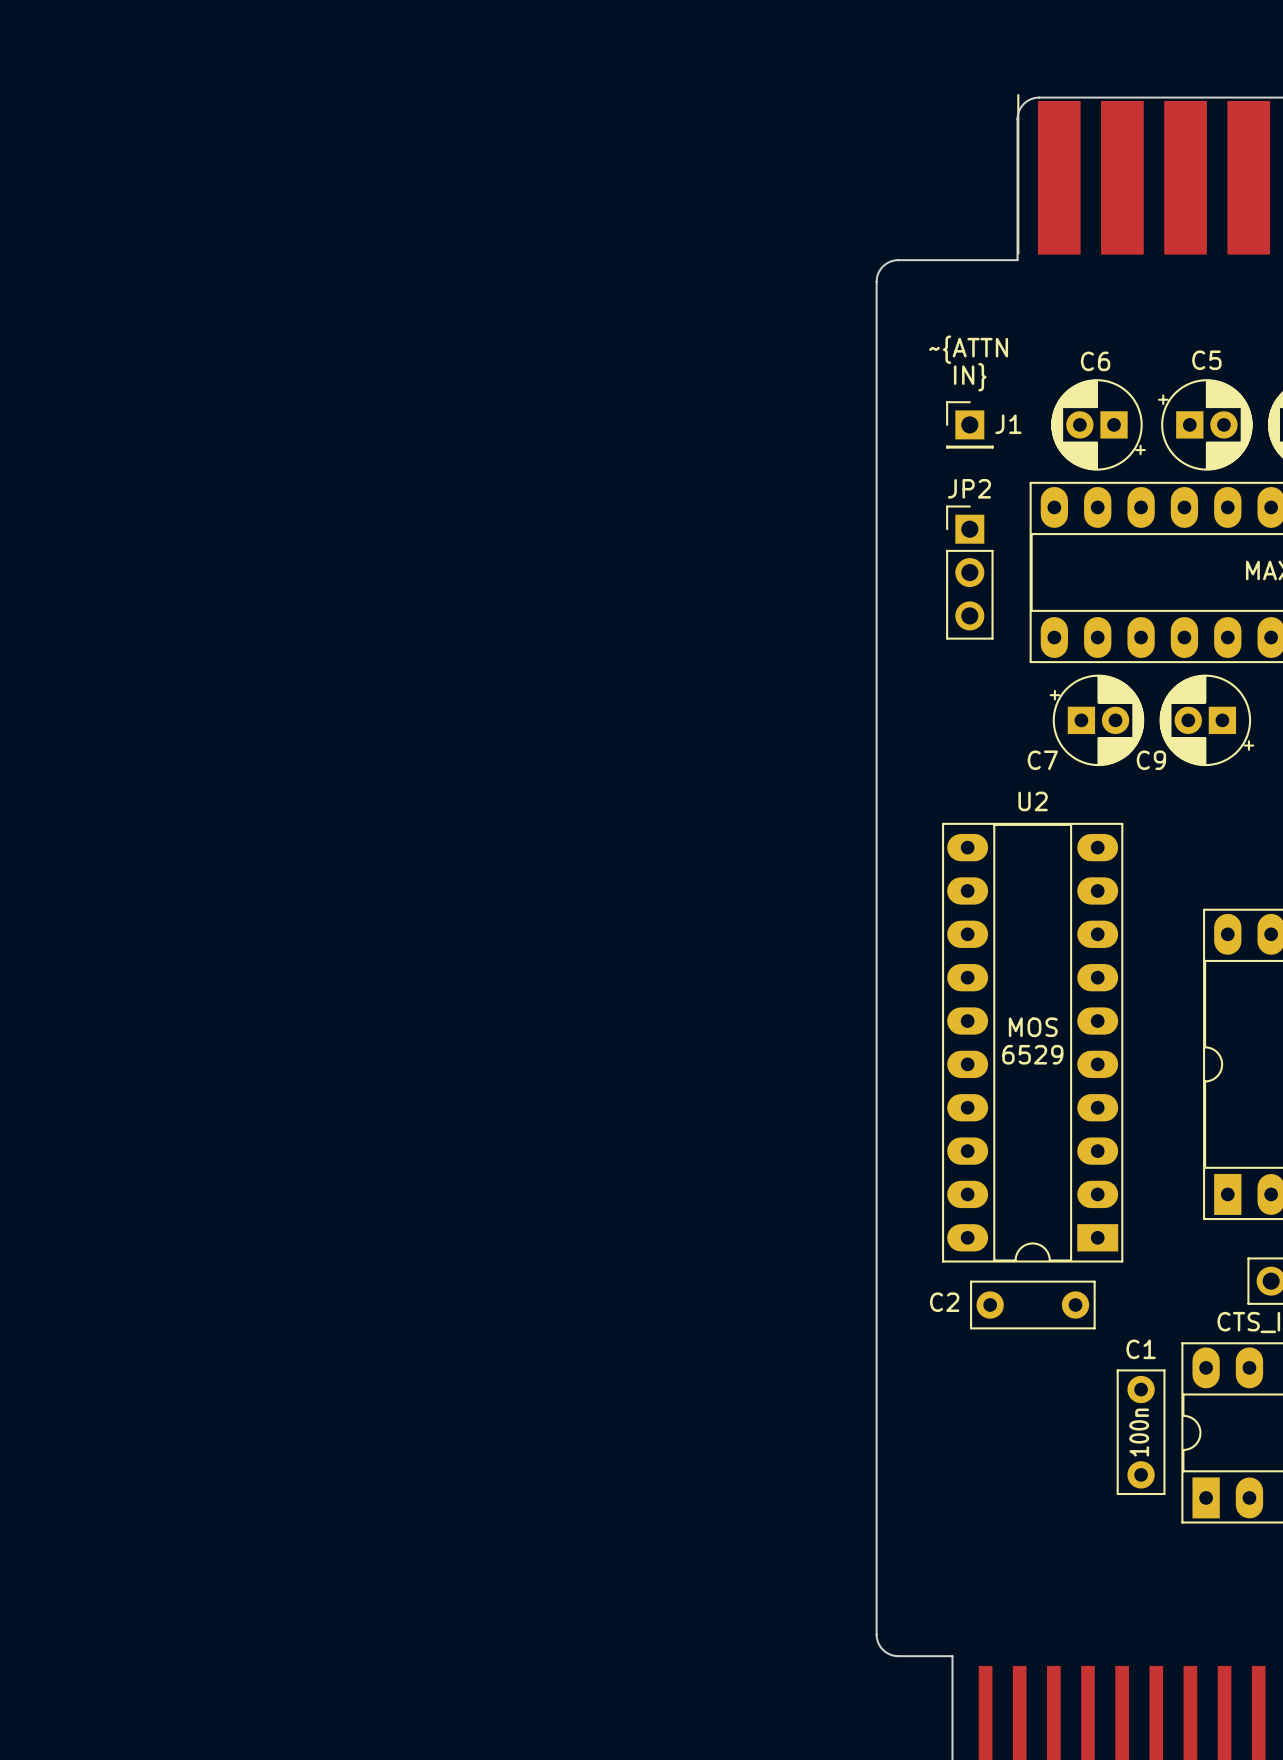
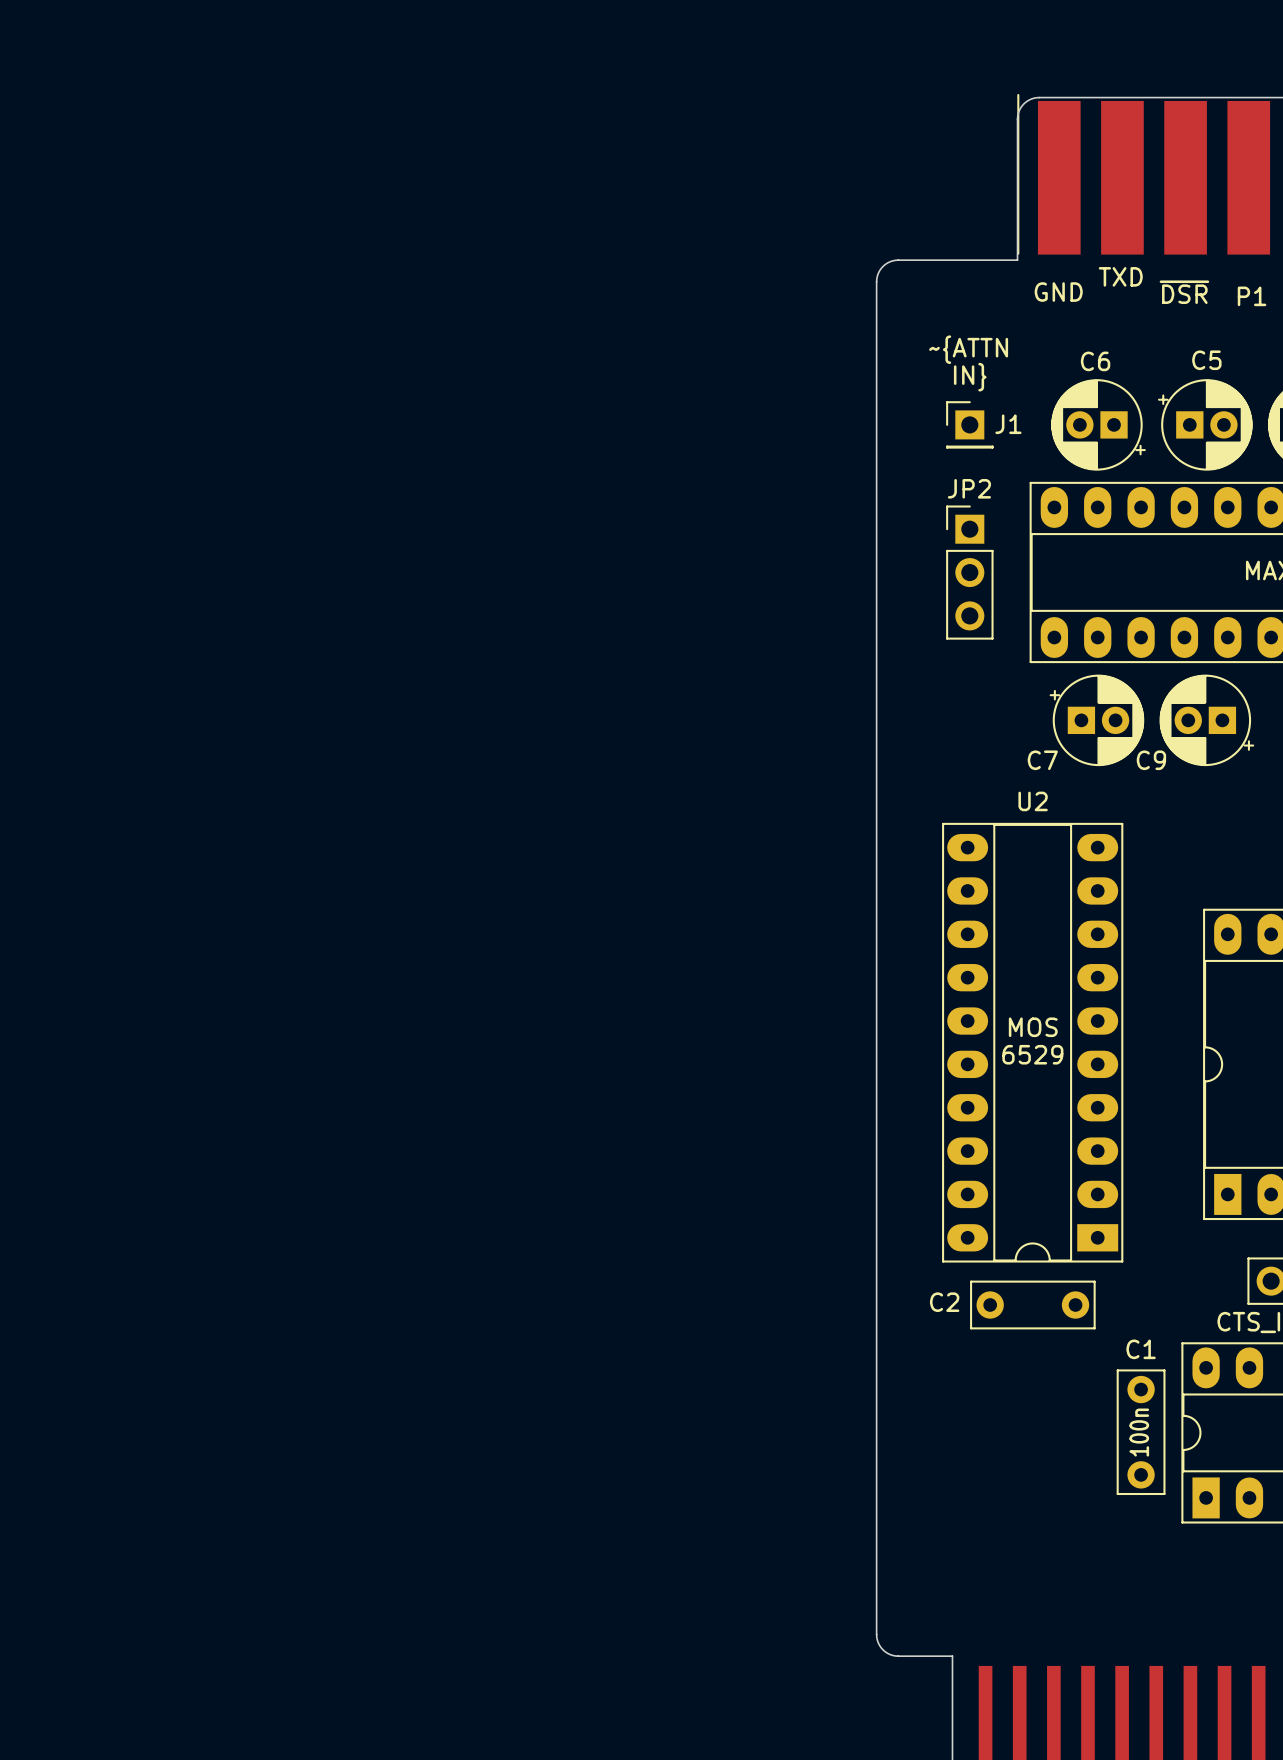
text: none -> TXD (1120, 276)
text: none -> GND (1058, 292)
text: none -> ~{DSR} (1184, 292)
text: none -> P1 (1252, 296)

